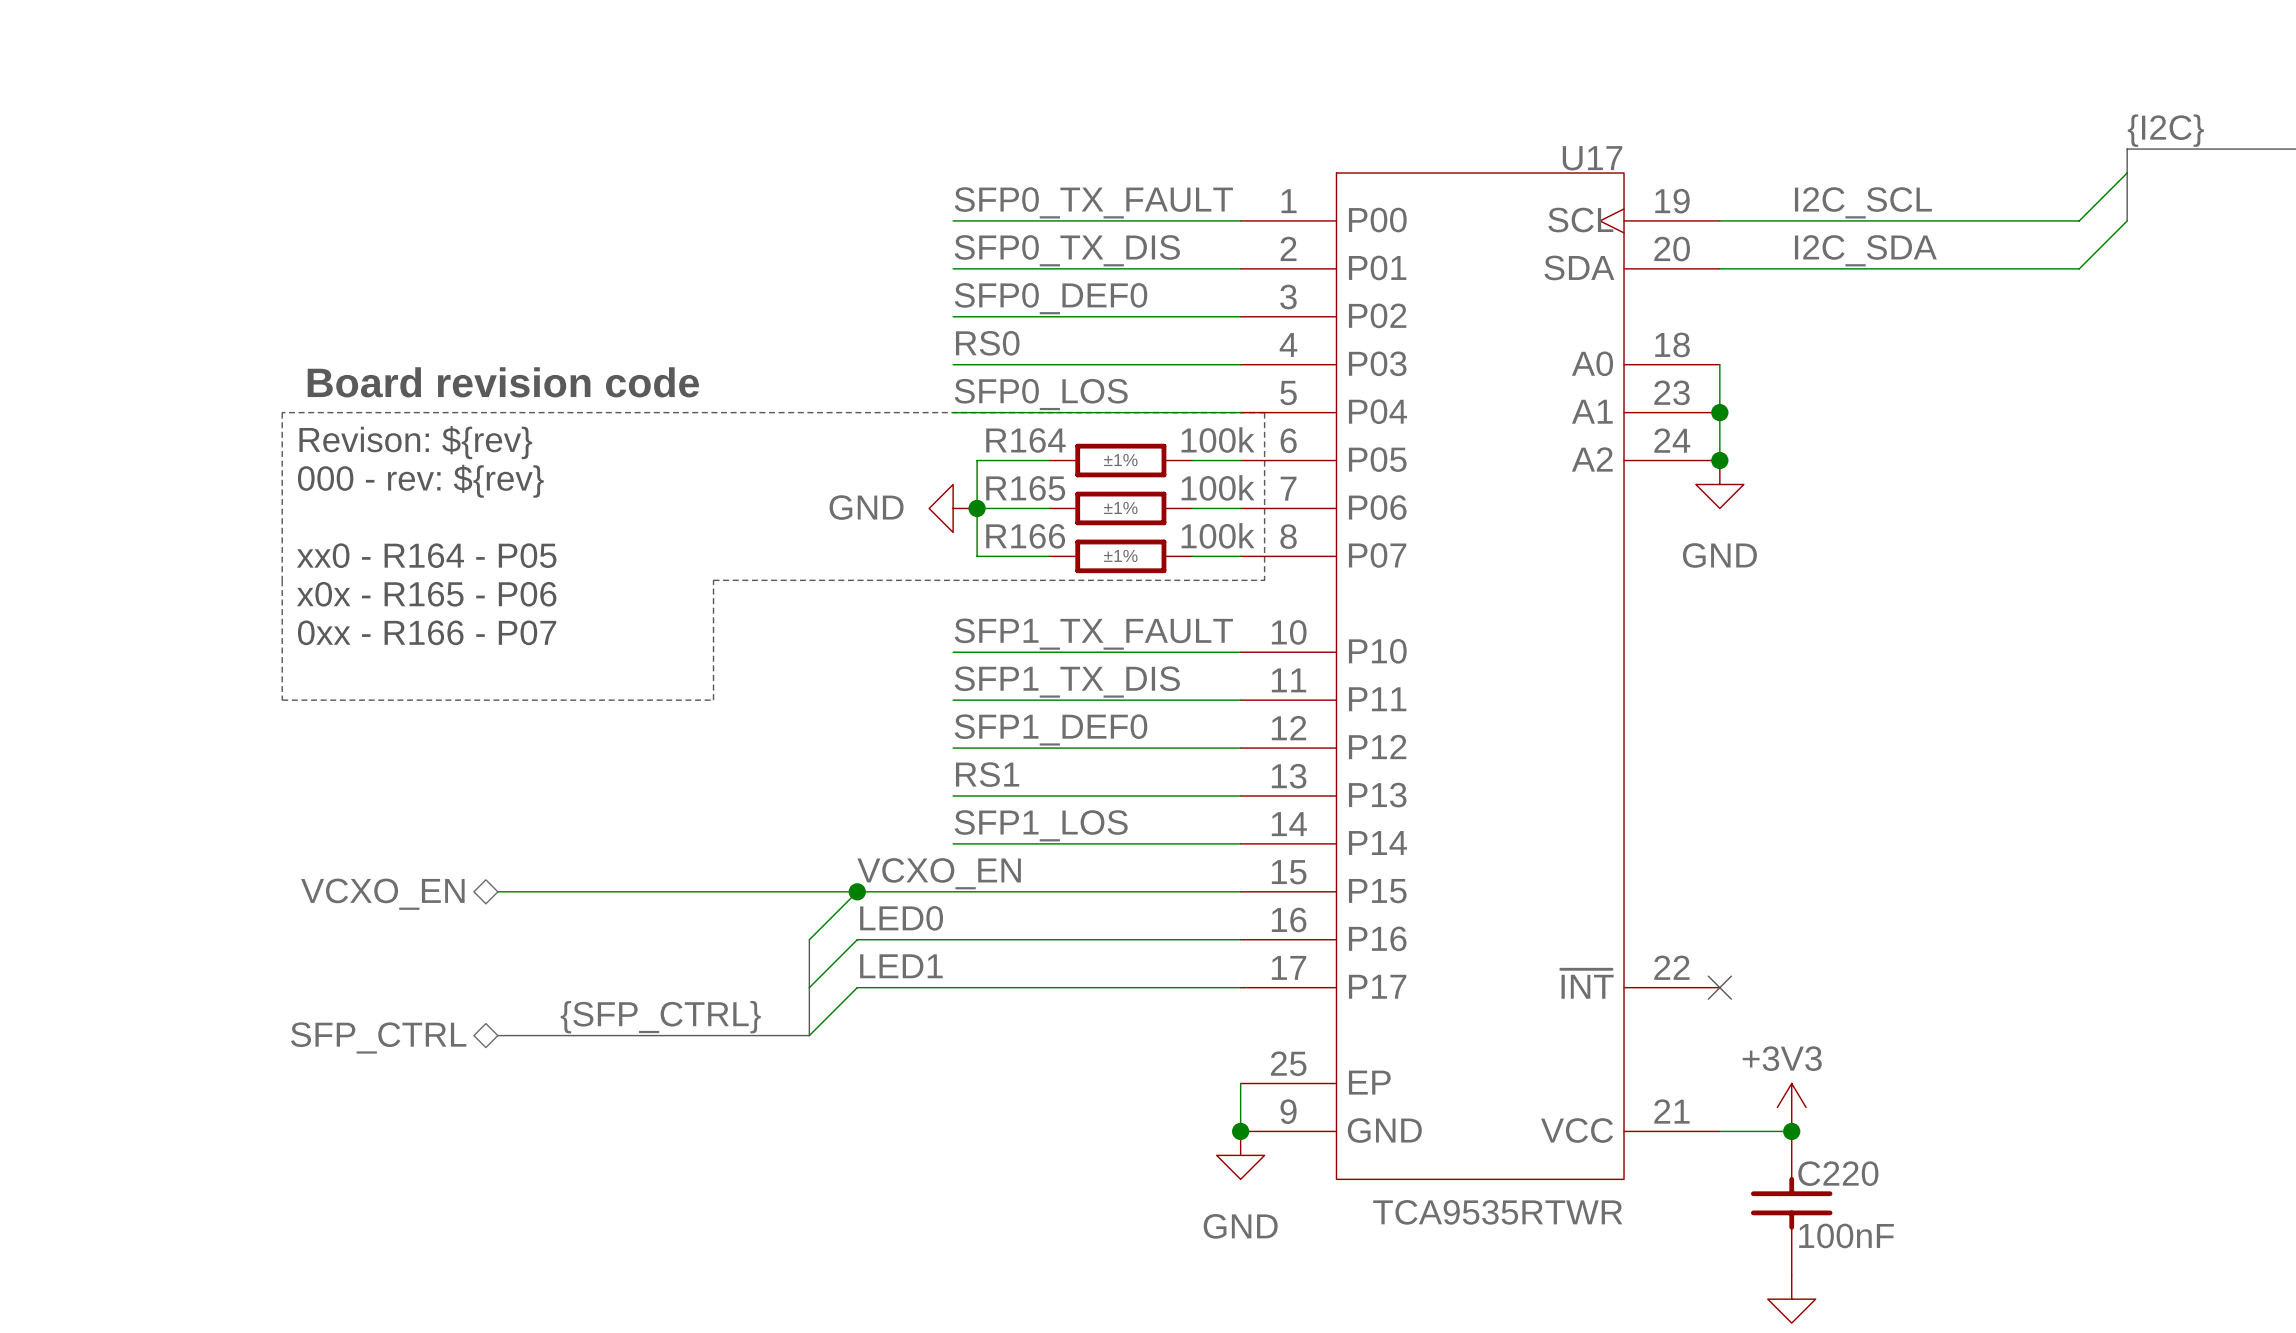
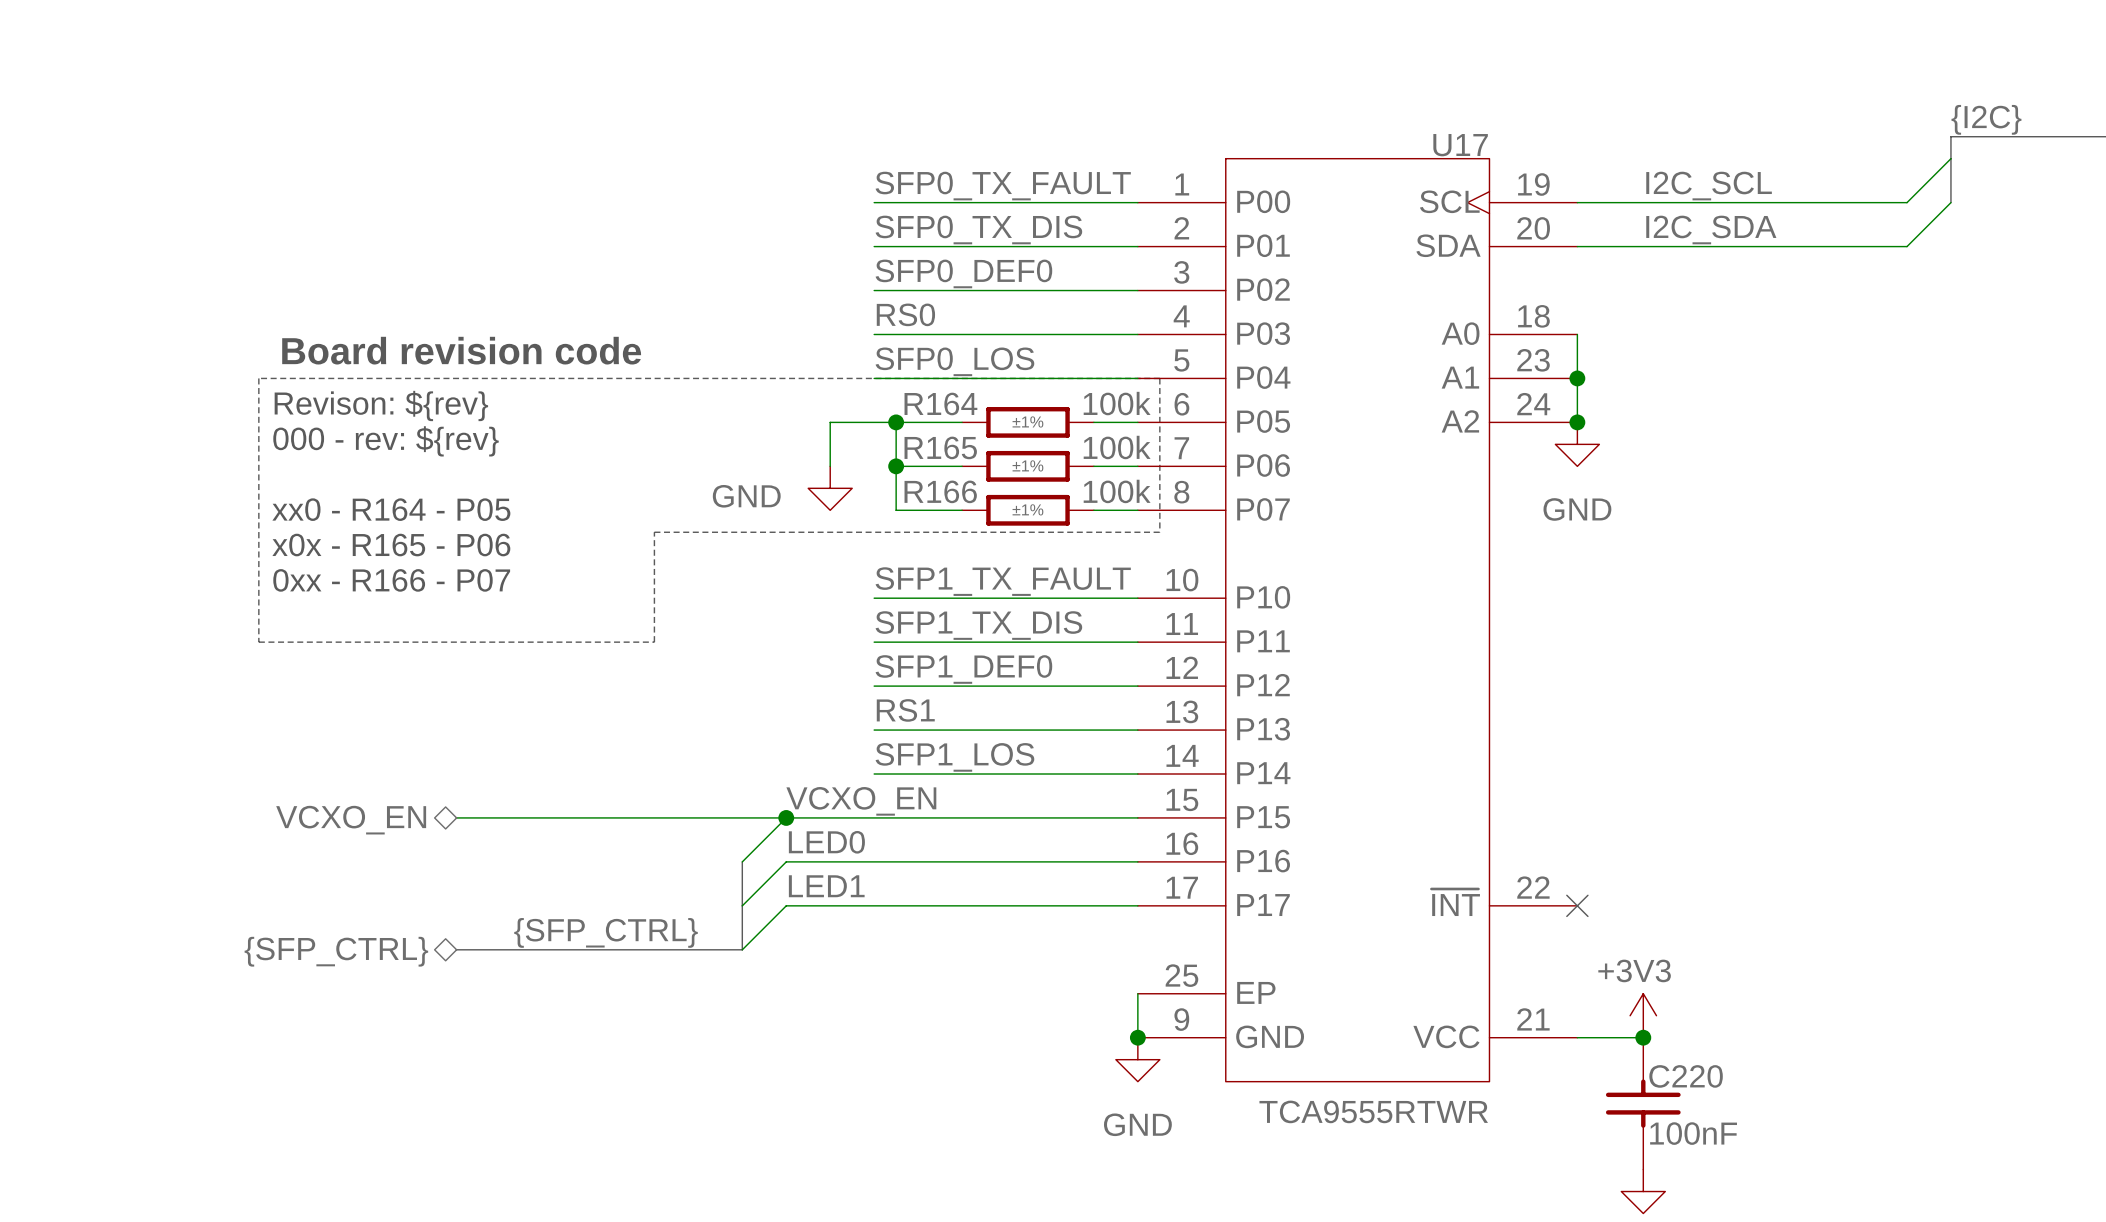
wire: none -> (896, 422) (830, 422) (830, 466)
junction: none -> (896, 422)
power symbol rotation: 0° (953, 508) -> 90° counterclockwise (830, 488)
power symbol position: GND (953, 508) -> GND (830, 488)
hierarchical label: SFP_CTRL (378, 1037) -> {SFP_CTRL} (336, 951)
U17 value: TCA9535RTWR (1497, 1212) -> TCA9555RTWR (1373, 1111)

